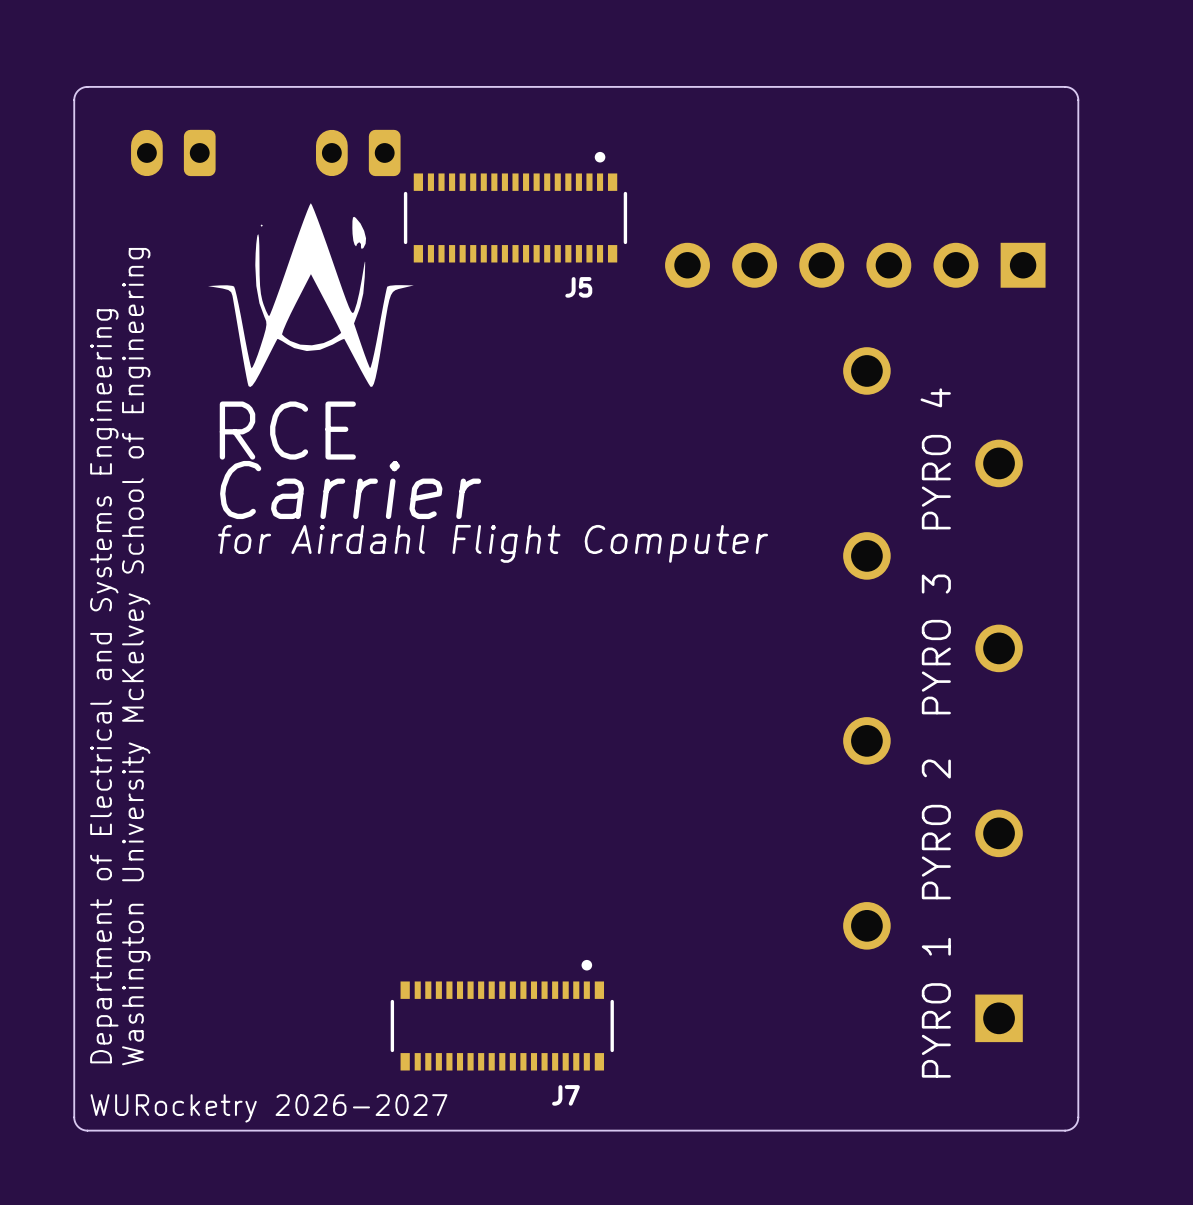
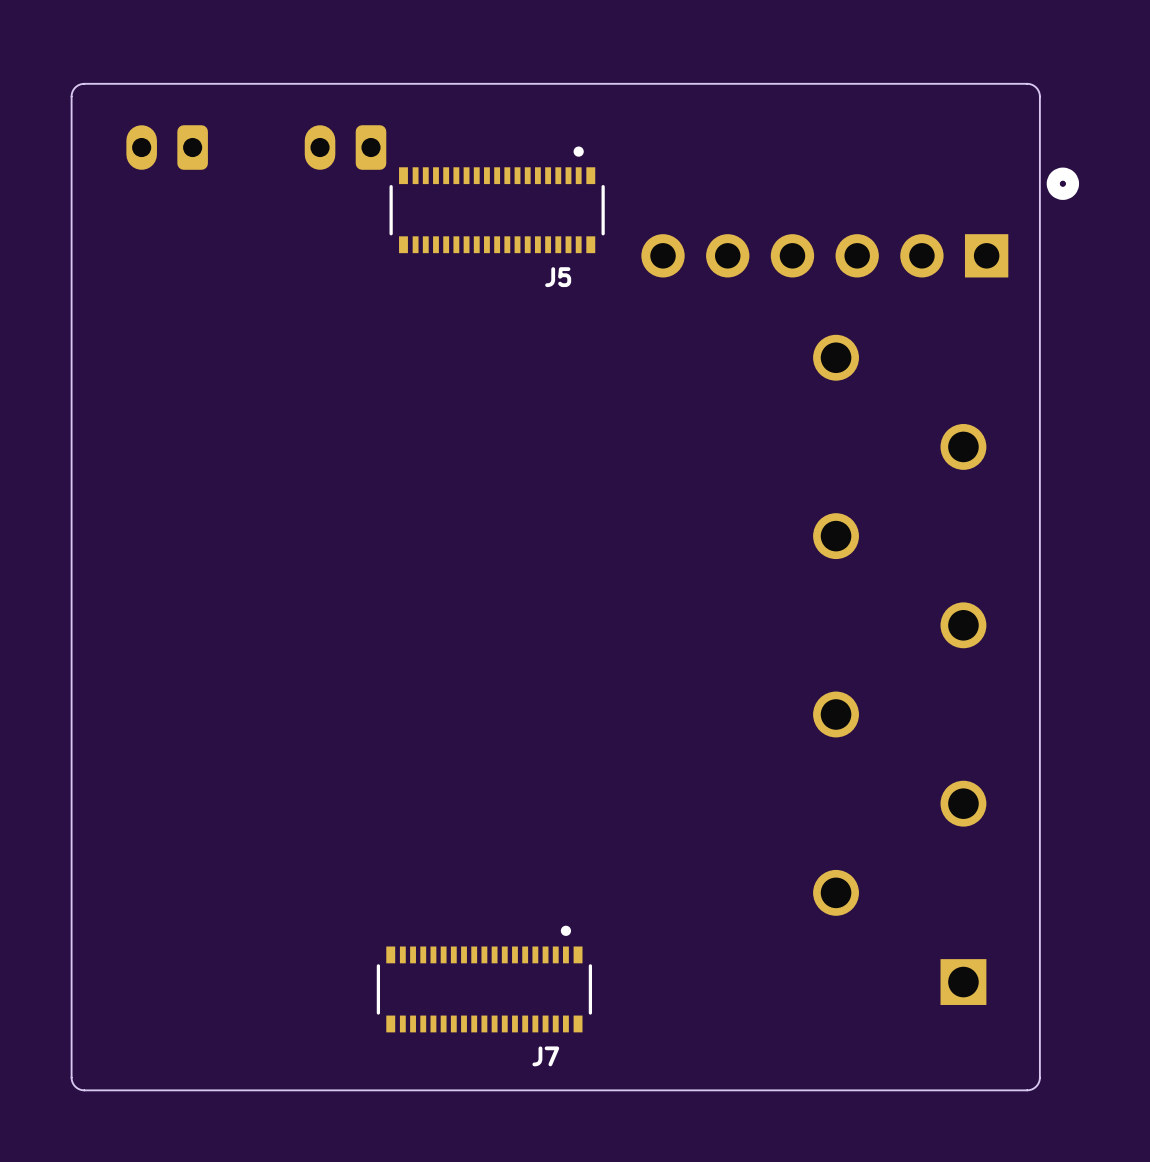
part: none -> (1062, 183)
drawing: [208, 203, 414, 388] -> none
text: RCE (287, 430) -> none
text: PYRO 4 (935, 458) -> none
text: Carrier (350, 490) -> none
text: for Airdahl Flight Computer (493, 543) -> none
text: PYRO 3 (936, 644) -> none
text: Washington University McKelvey School of Engineering (136, 656) -> none
text: Department of Electrical and Systems Engineering (104, 686) -> none
text: PYRO 2 (936, 829) -> none
text: PYRO 1 (936, 1007) -> none
text: WURocketry 2026-2027 (268, 1108) -> none

